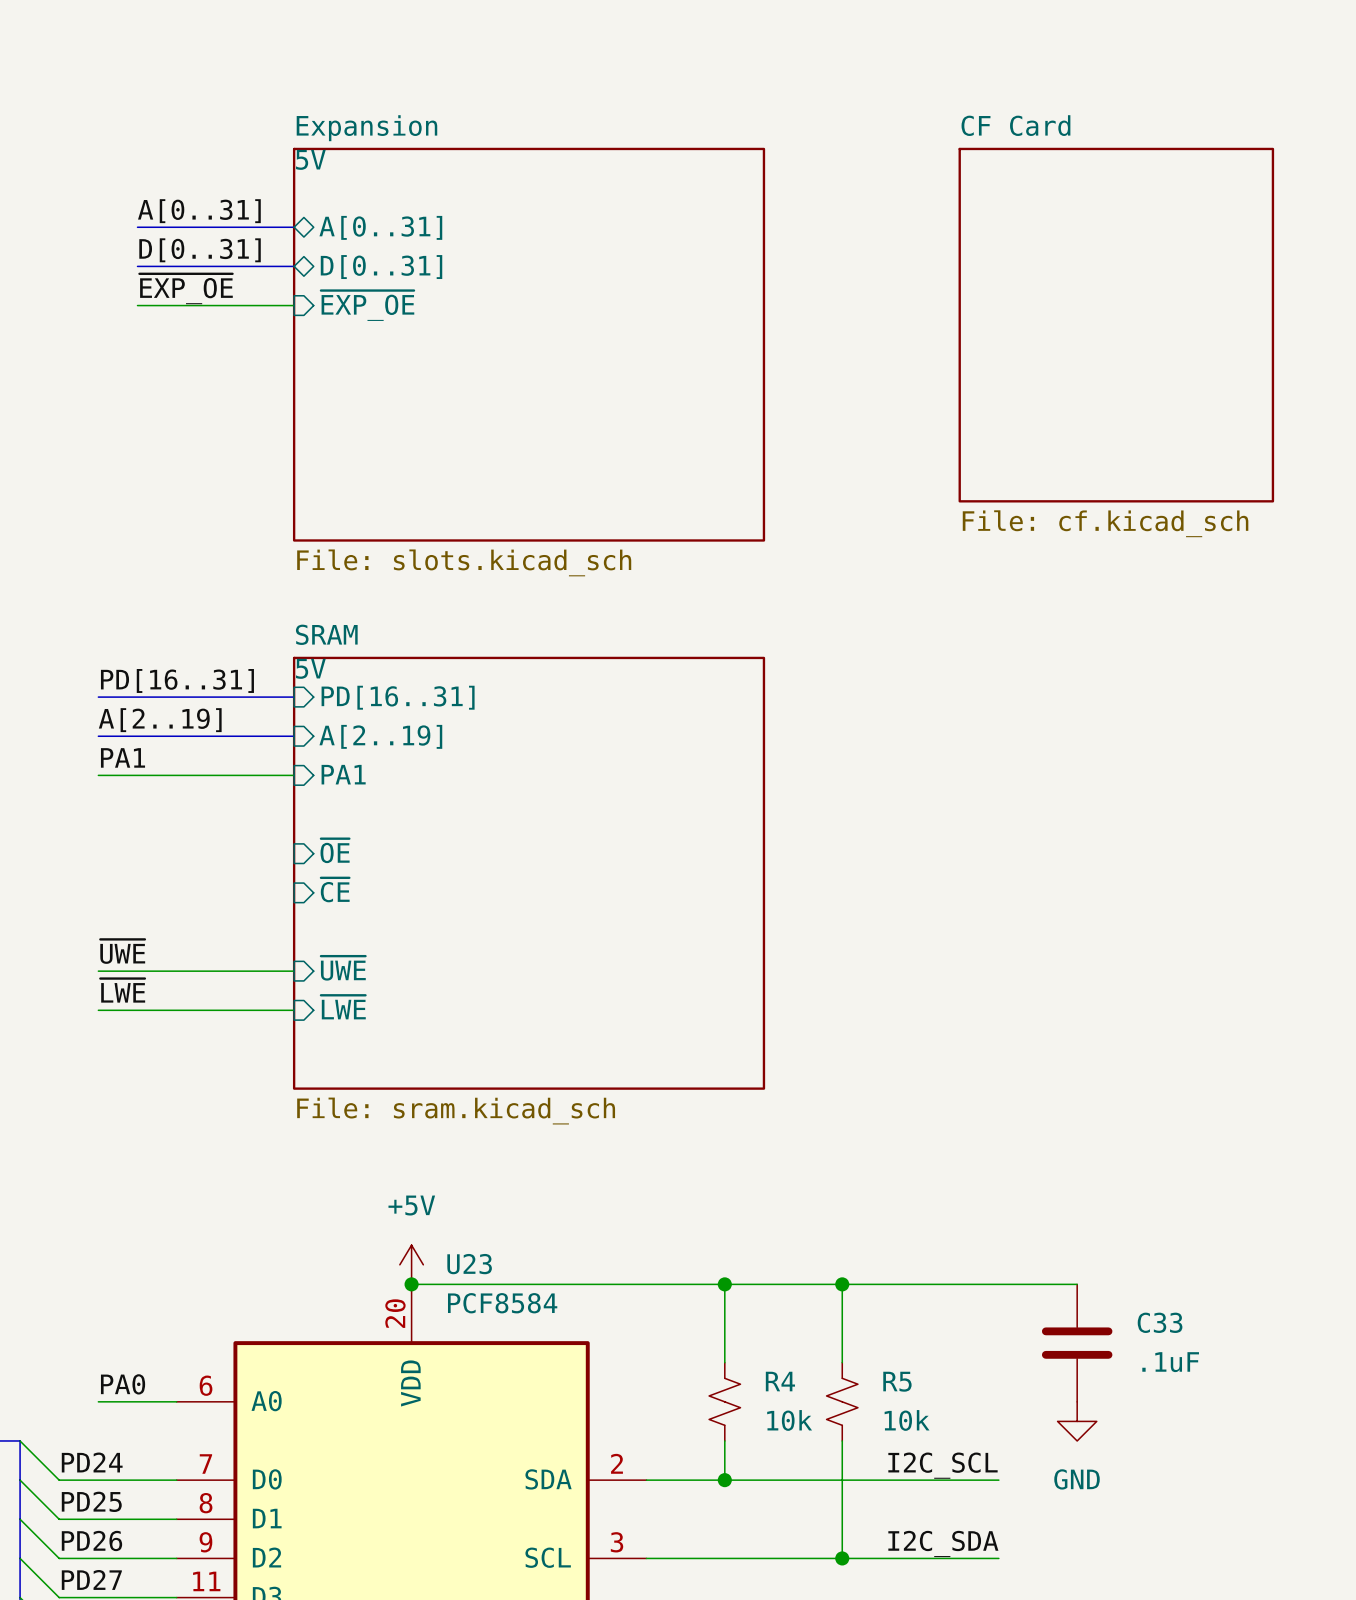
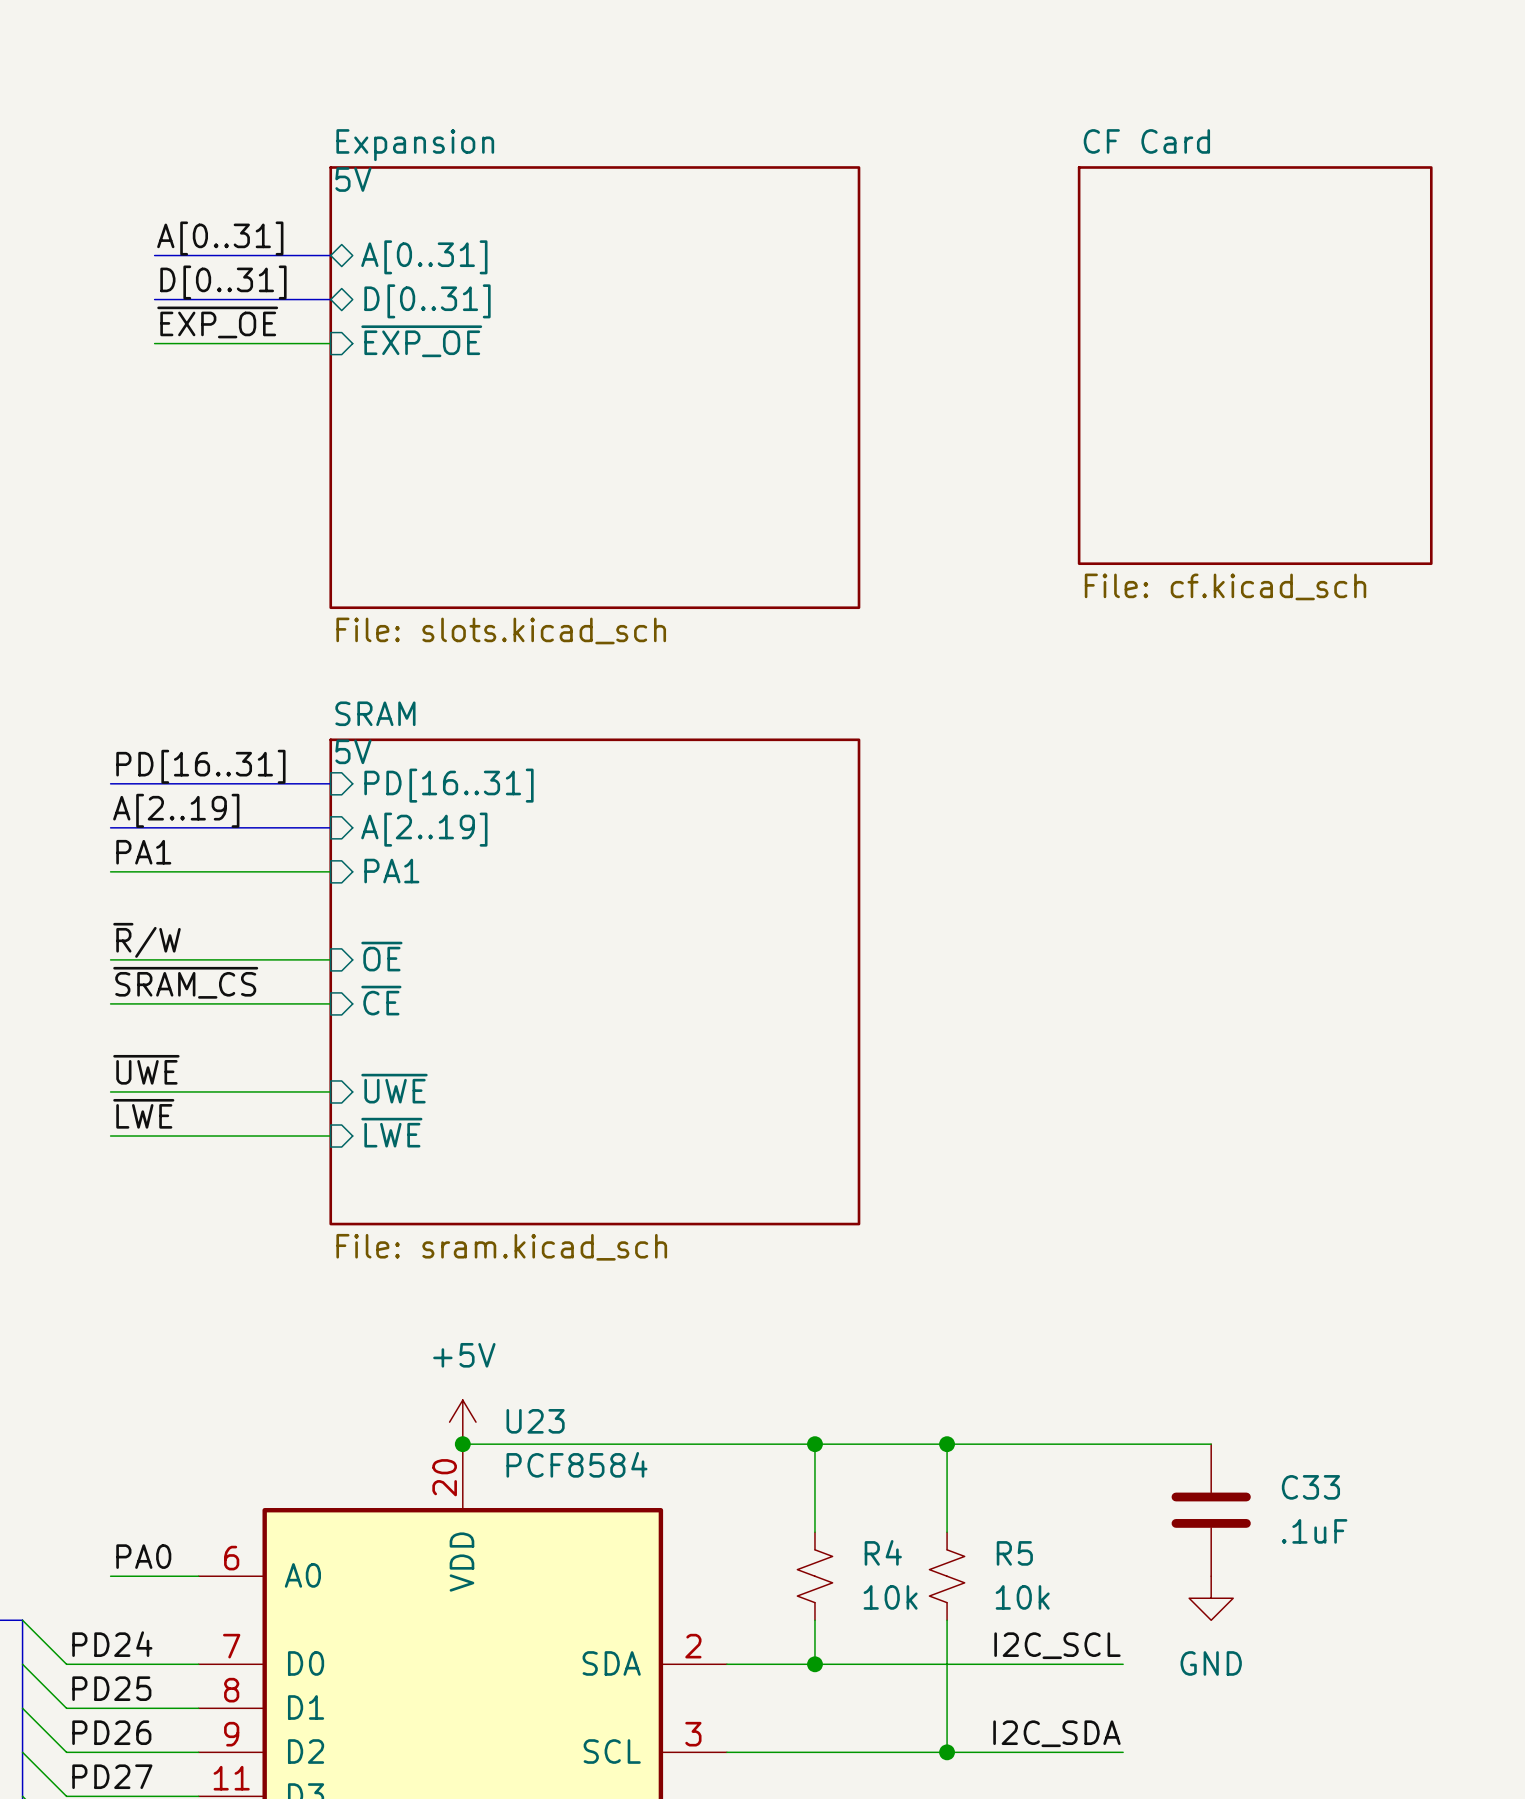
label: none -> ~{R}/W (146, 940)
wire: none -> (110, 959) (330, 959)
label: none -> ~{SRAM_CS} (185, 982)
wire: none -> (110, 1003) (330, 1003)

